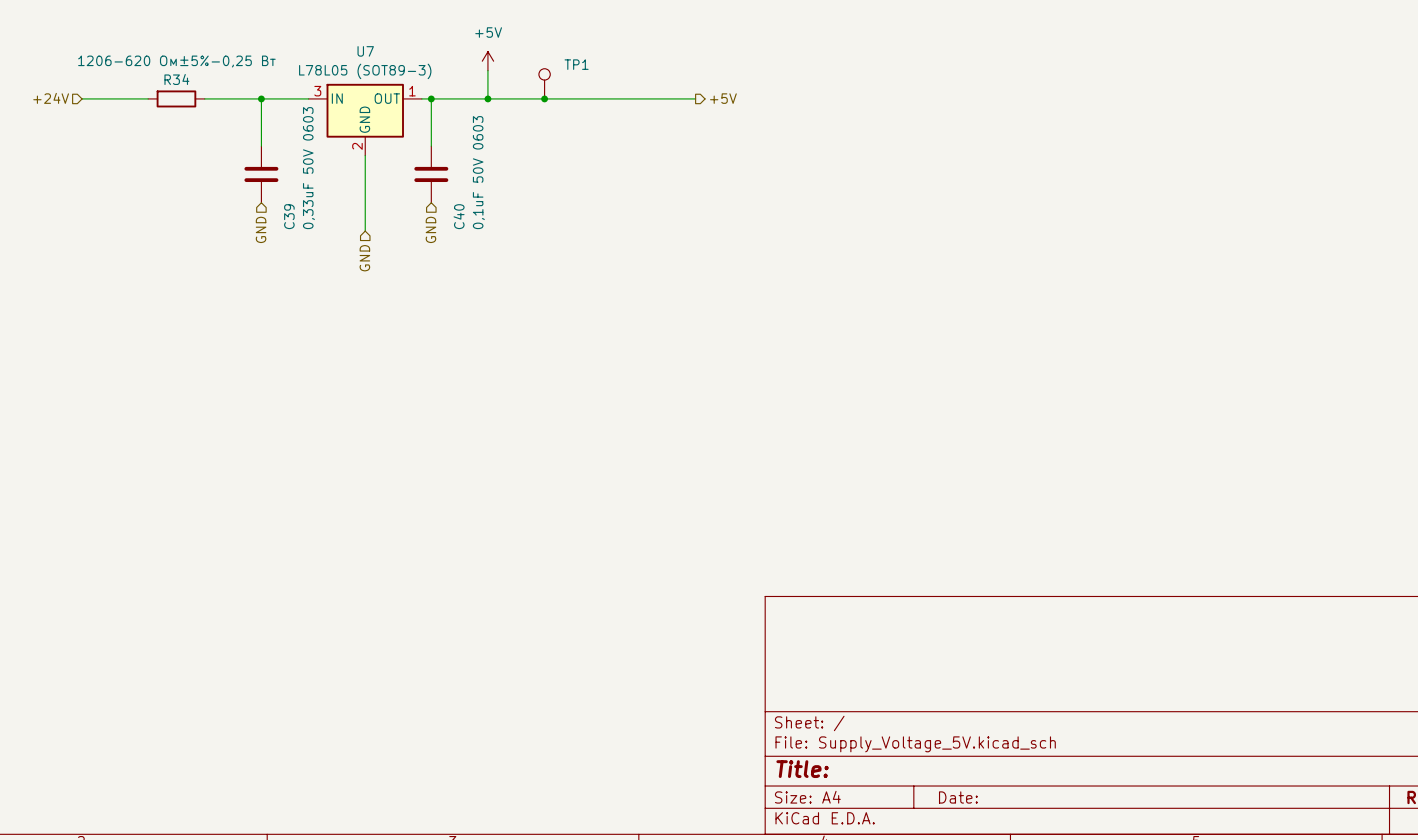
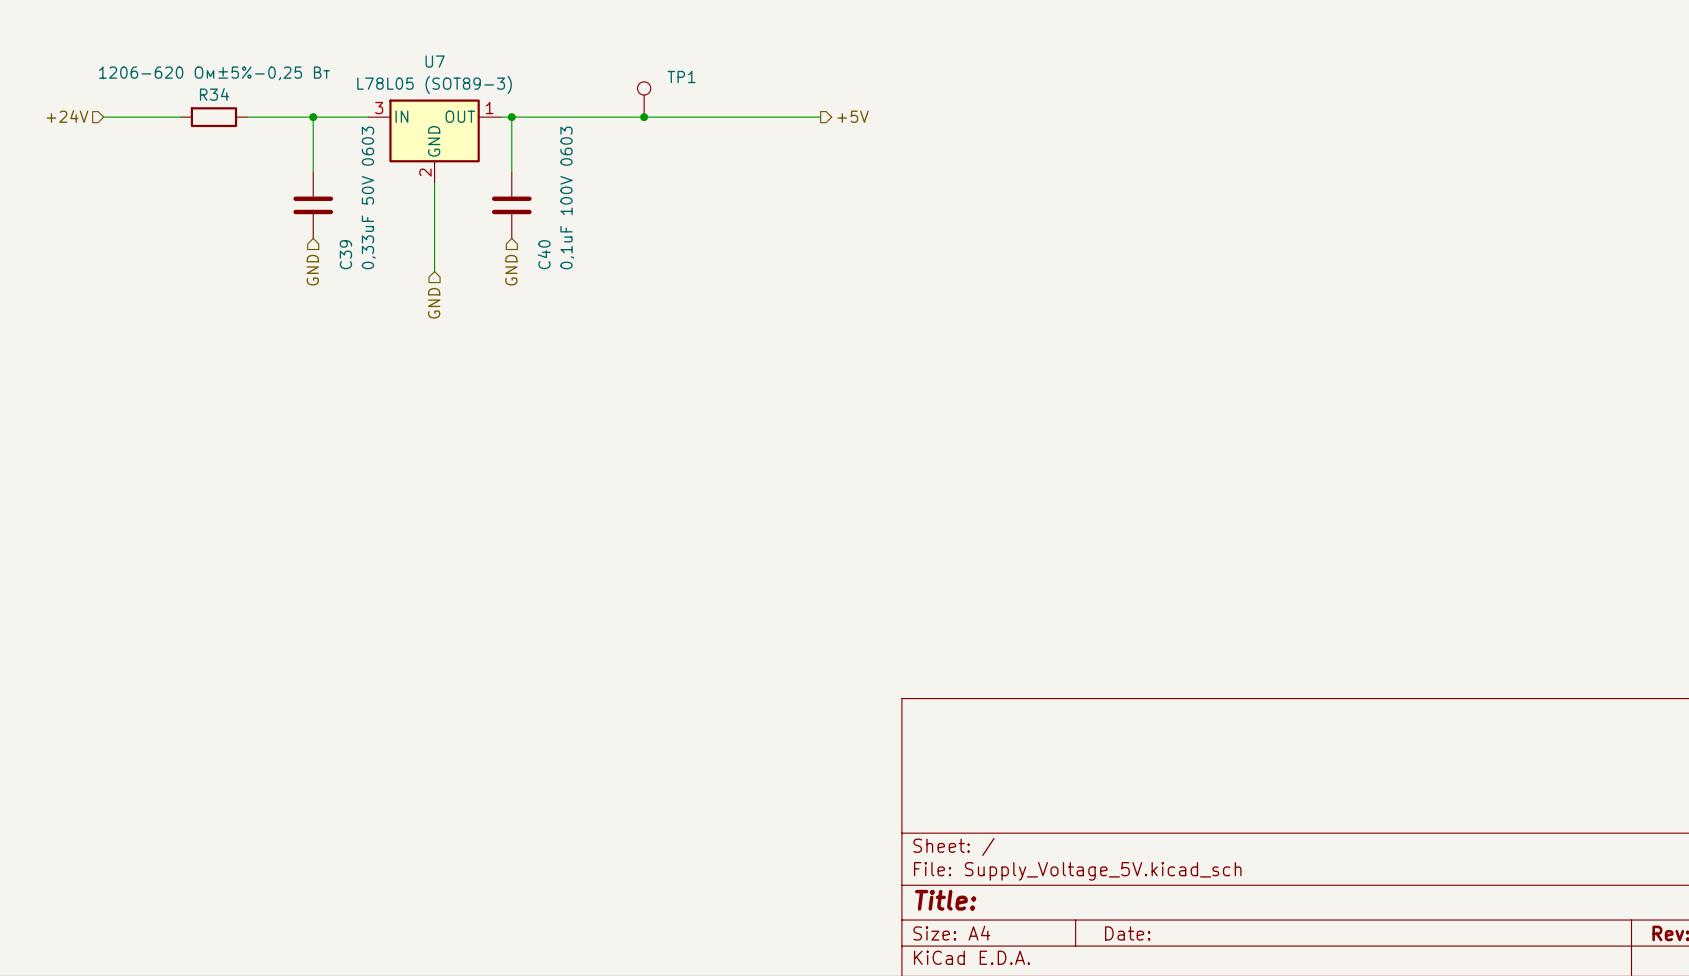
power symbol: +5V (487, 61) -> none
wire: (487, 70) (487, 98) -> none
junction: (487, 98) -> none
C40 value: 0,1uF 50V 0603 (478, 172) -> 0,1uF 100V 0603 (567, 197)

